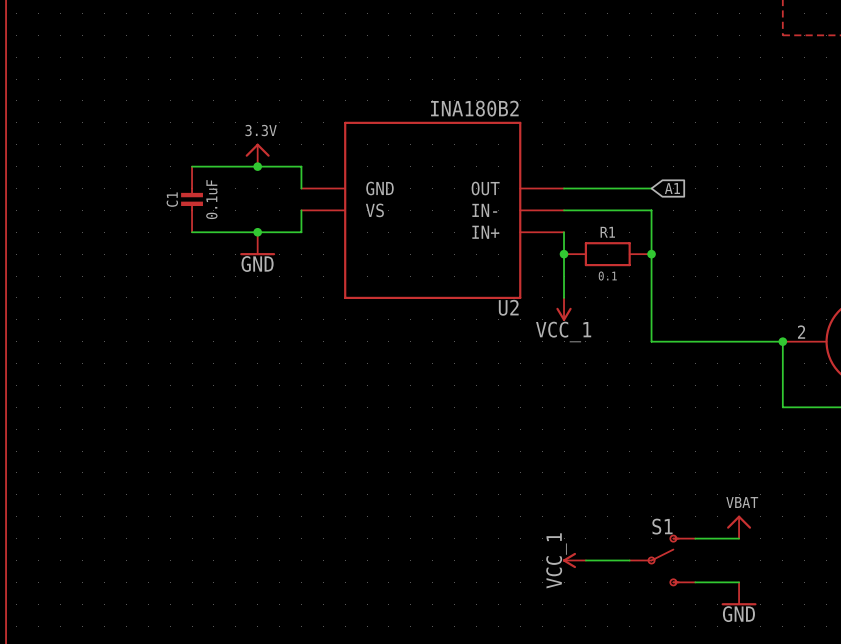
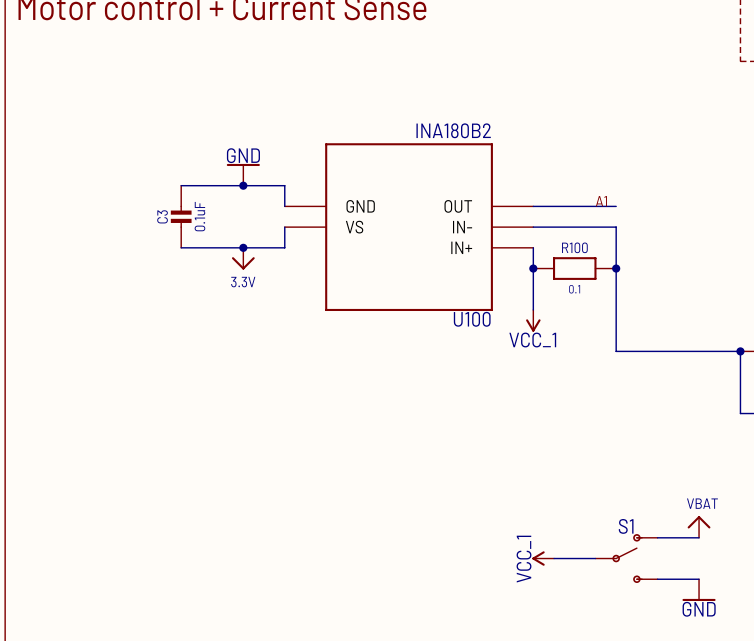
power symbol: 3.3V (257, 155) -> GND (243, 174)
label: none -> A1 (601, 201)
global label: A1 (672, 188) -> none
C1 name: C1 (172, 199) -> C3 (162, 216)
R1 name: R1 (607, 232) -> R100 (574, 247)
power symbol: GND (257, 243) -> 3.3V (243, 258)
U2 name: U2 (508, 307) -> U100 (472, 319)

